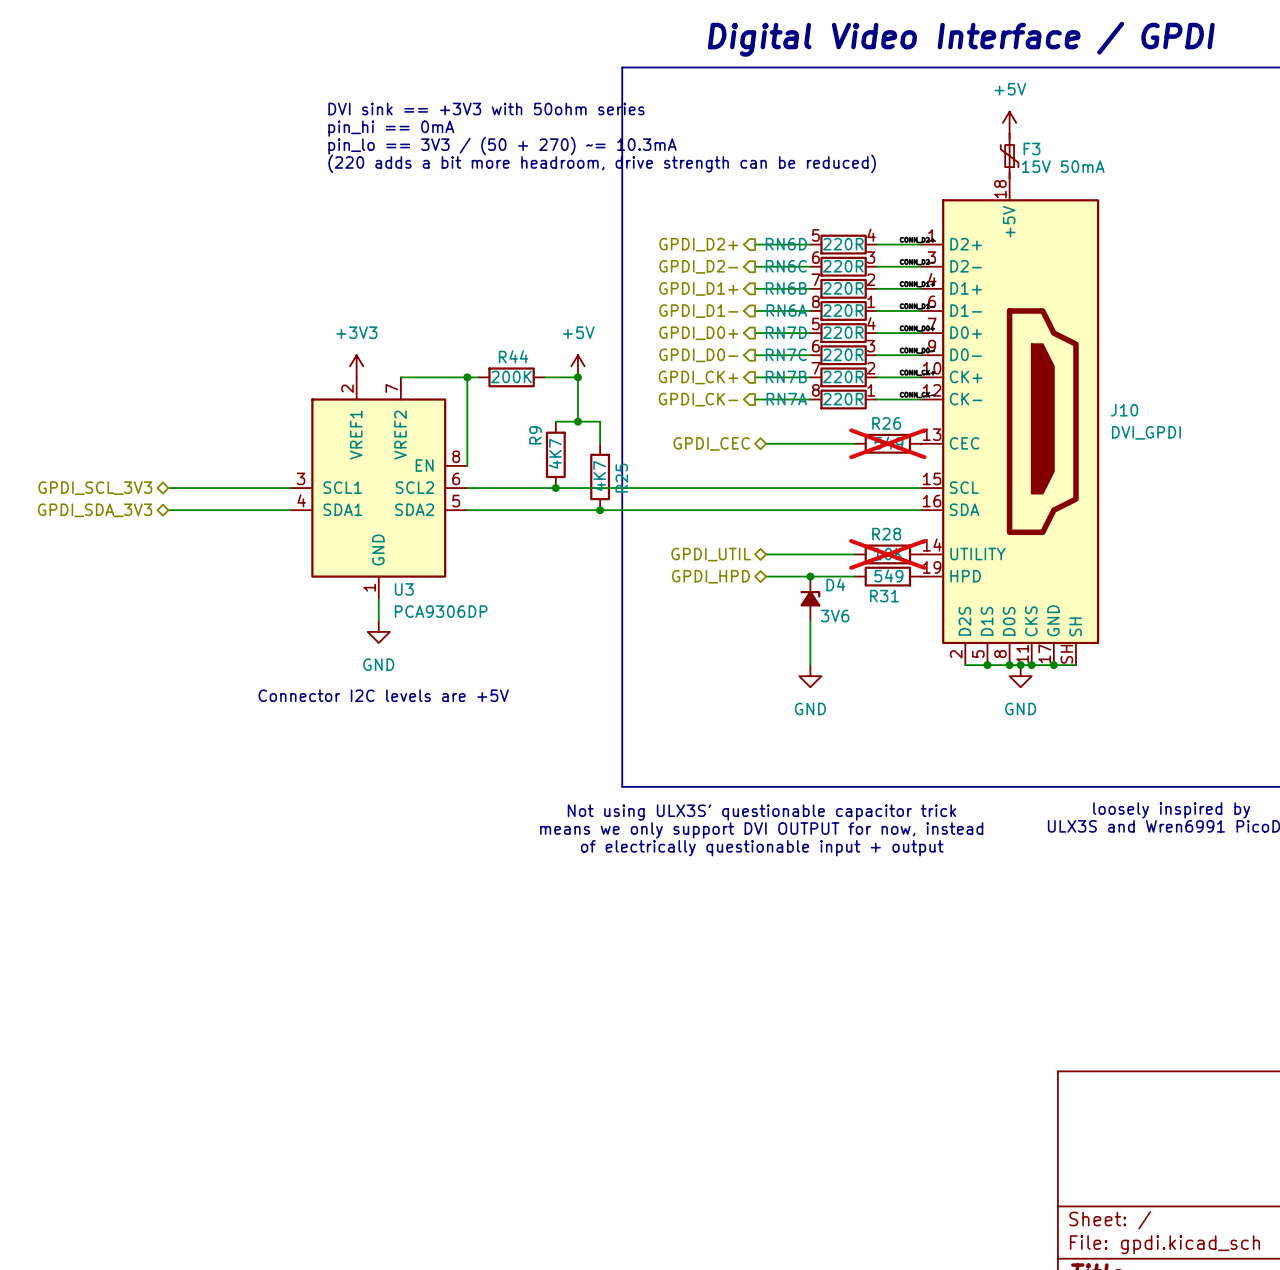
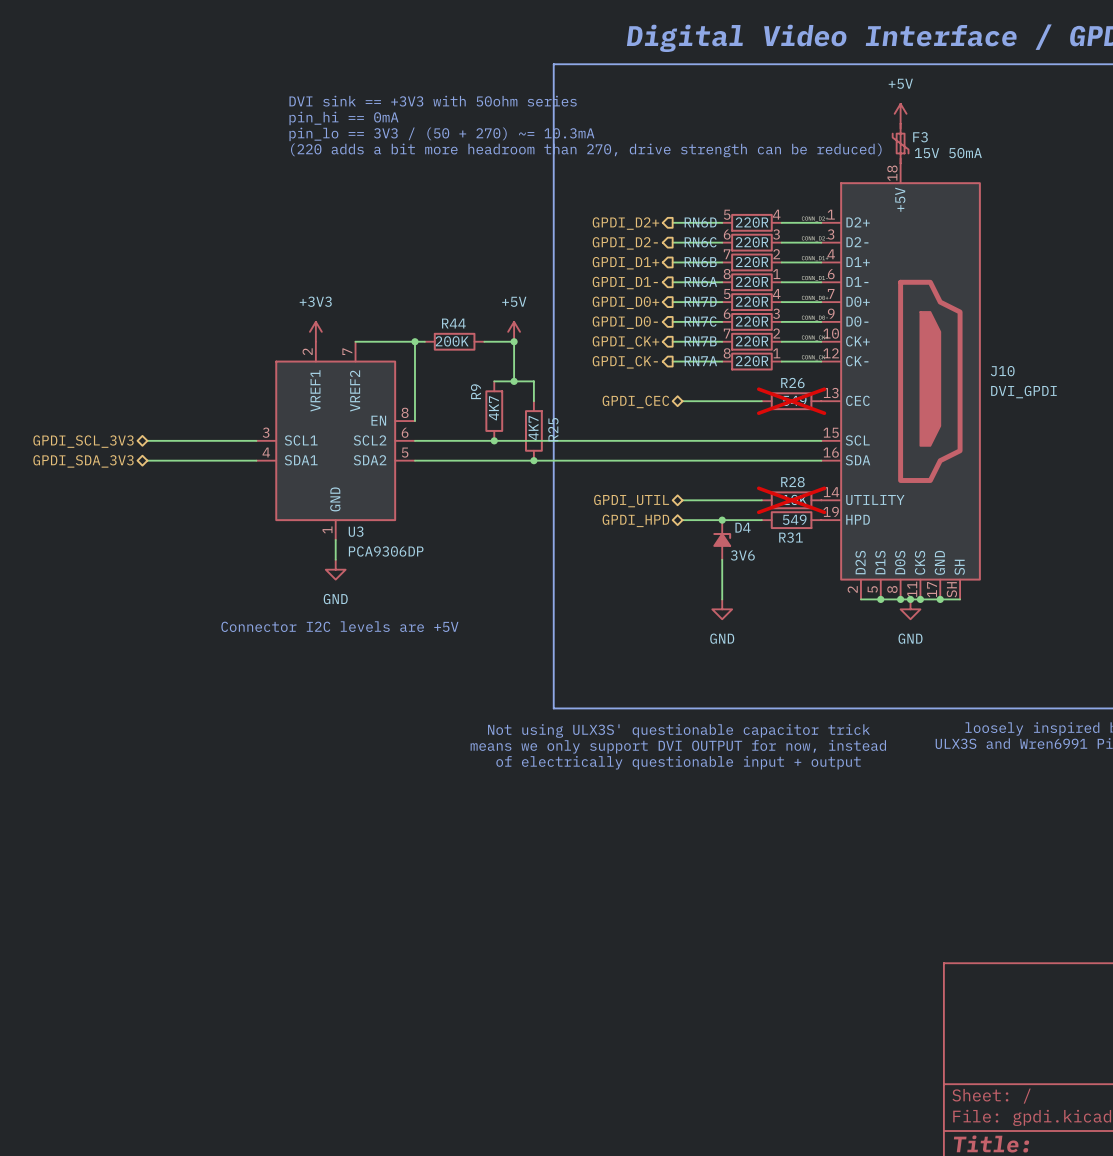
text: (220 adds a bit more headroom, drive strength can be reduced) (602, 163) -> (220 adds a bit more headroom than 270, drive strength can be reduced) (586, 150)

